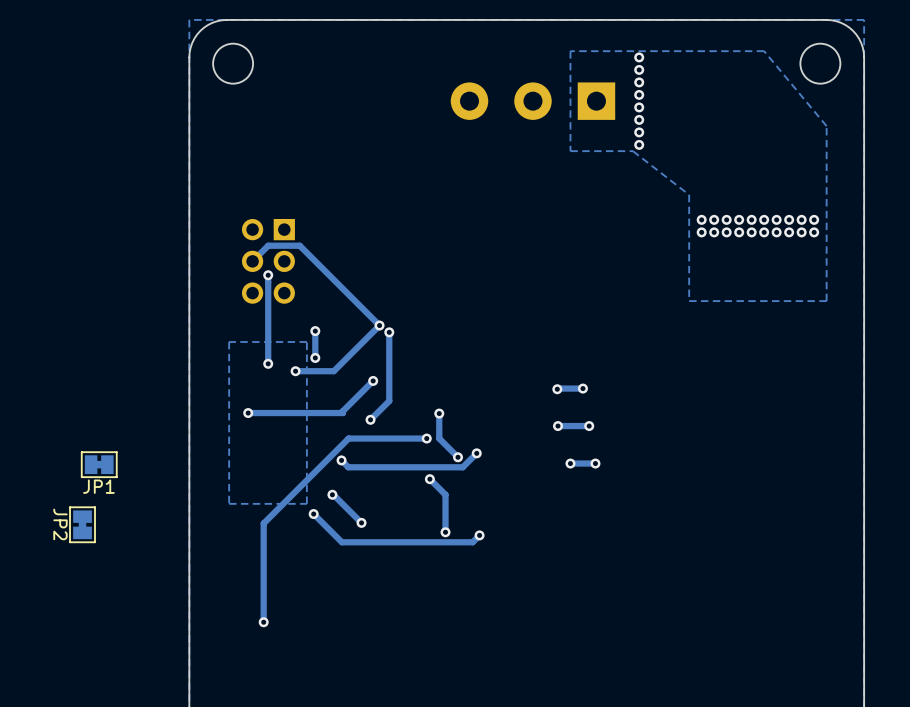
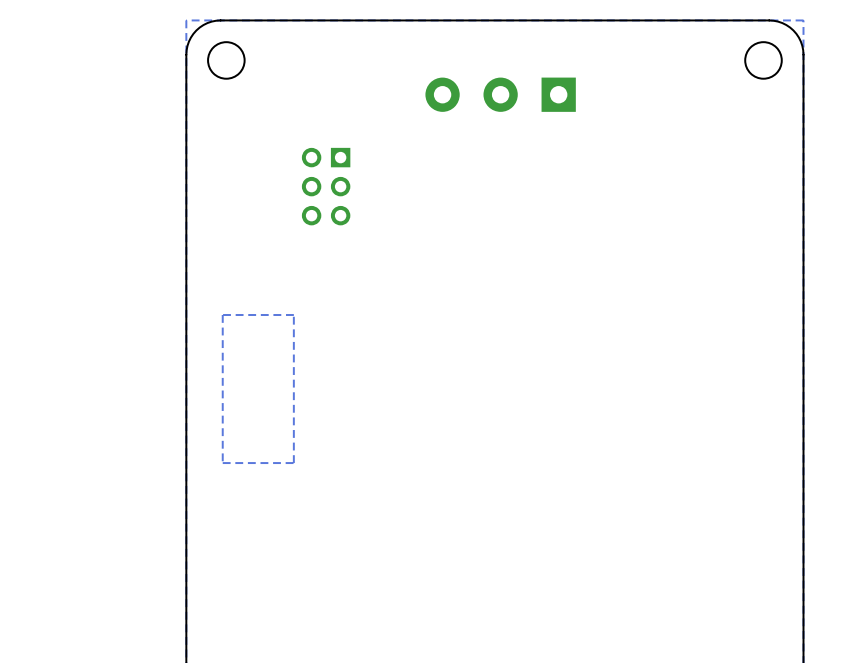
zone outline: (764, 51) (826, 126) (826, 301) (689, 301) (689, 194) (632, 151) (570, 151) (570, 51) (764, 51) -> none
via: (639, 57) -> none
via: (639, 69) -> none
via: (639, 82) -> none
via: (639, 94) -> none
via: (639, 107) -> none
via: (639, 119) -> none
via: (639, 132) -> none
via: (639, 144) -> none
via: (701, 219) -> none
via: (714, 219) -> none
via: (726, 219) -> none
via: (739, 219) -> none
via: (751, 219) -> none
via: (764, 219) -> none
via: (776, 219) -> none
via: (789, 219) -> none
via: (801, 219) -> none
via: (814, 219) -> none
via: (701, 232) -> none
via: (714, 232) -> none
via: (726, 232) -> none
via: (739, 232) -> none
via: (751, 232) -> none
via: (764, 232) -> none
via: (776, 232) -> none
via: (789, 232) -> none
via: (801, 232) -> none
via: (814, 232) -> none
track: (252, 261) (268, 245) (299, 245) (379, 325) (333, 371) (295, 371) -> none
part position: (268, 261) -> (326, 186)
track: (268, 275) (268, 363) -> none
via: (268, 275) -> none
via: (379, 325) -> none
track: (315, 331) (315, 357) -> none
via: (315, 331) -> none
track: (389, 332) (389, 401) (370, 419) -> none
via: (389, 332) -> none
via: (315, 357) -> none
via: (268, 363) -> none
via: (295, 371) -> none
track: (373, 380) (342, 413) (248, 413) -> none
via: (373, 380) -> none
track: (582, 388) (557, 389) -> none
via: (582, 388) -> none
via: (557, 389) -> none
via: (248, 413) -> none
track: (439, 413) (439, 438) (458, 457) -> none
via: (439, 413) -> none
via: (370, 419) -> none
via: (557, 426) -> none
track: (589, 426) (557, 426) -> none
via: (589, 426) -> none
track: (426, 438) (348, 438) (263, 523) (263, 622) -> none
via: (426, 438) -> none
track: (476, 453) (462, 467) (348, 467) (341, 460) -> none
via: (476, 453) -> none
via: (458, 457) -> none
via: (341, 460) -> none
via: (570, 463) -> none
track: (595, 463) (570, 463) -> none
via: (595, 463) -> none
JP1: (99, 464) -> none
track: (429, 479) (445, 494) (445, 532) -> none
via: (429, 479) -> none
track: (332, 494) (361, 522) -> none
via: (332, 494) -> none
track: (313, 514) (341, 542) (472, 542) (479, 535) -> none
via: (313, 514) -> none
via: (361, 522) -> none
JP2: (82, 524) -> none
via: (445, 532) -> none
via: (479, 535) -> none
via: (263, 622) -> none

